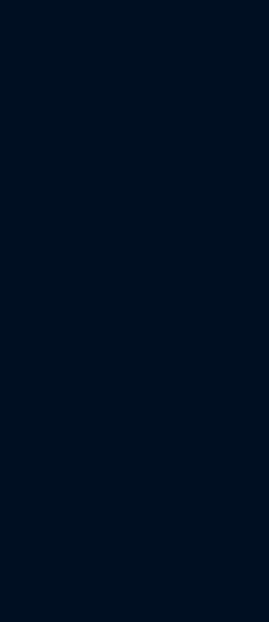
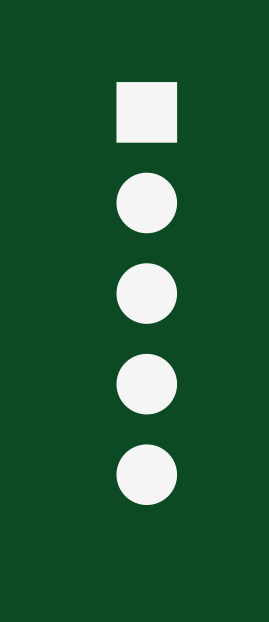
drawing: none -> [116, 82, 178, 506]

